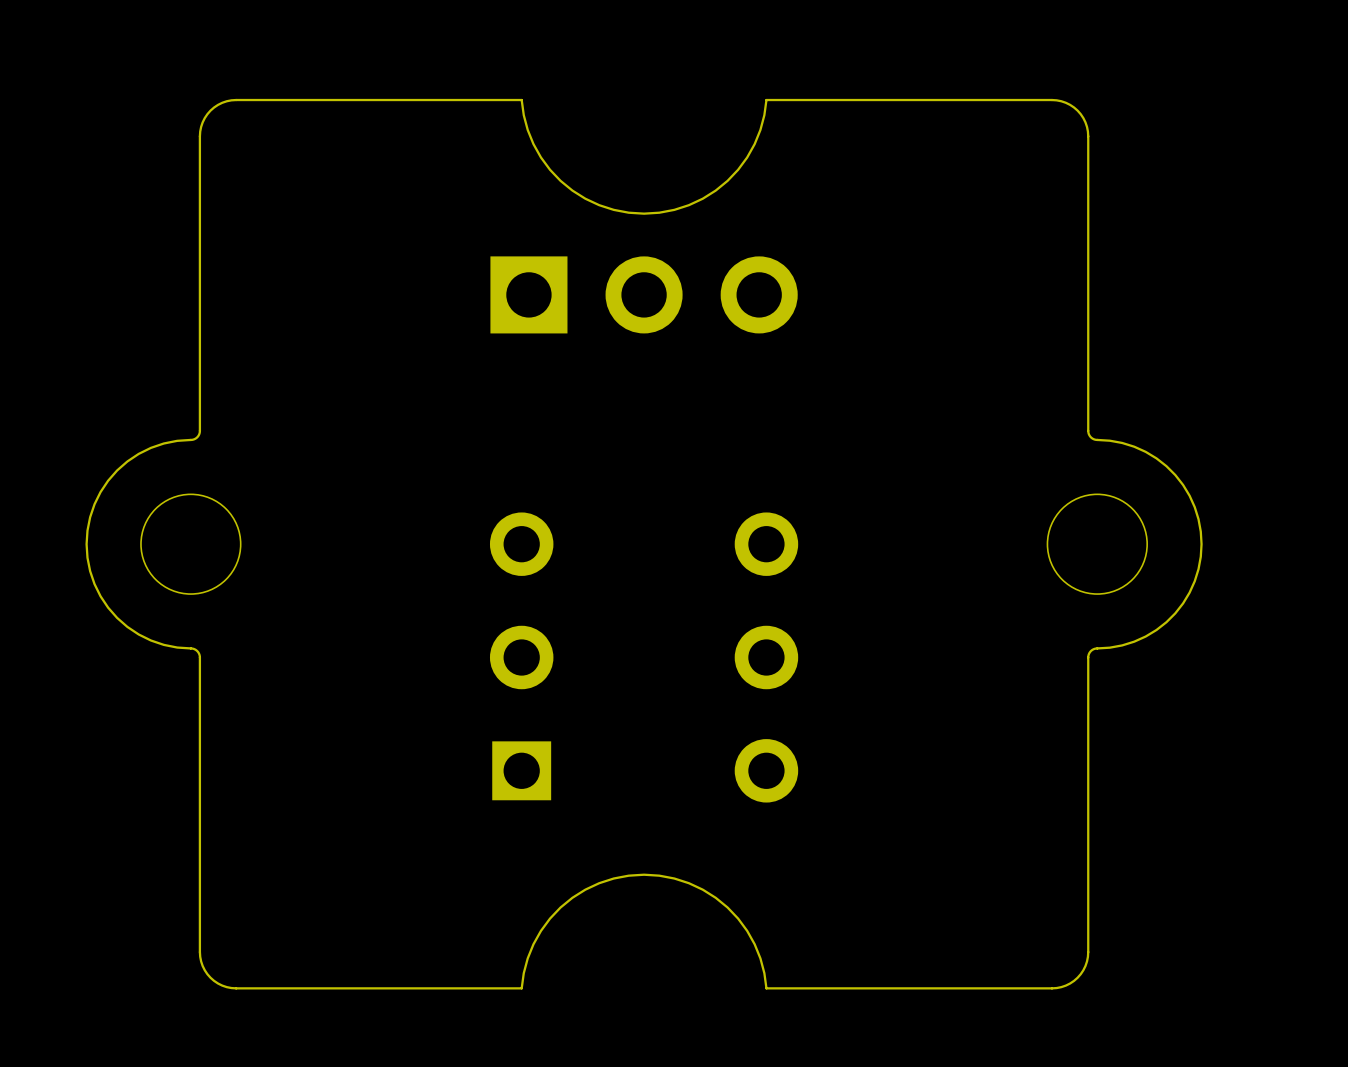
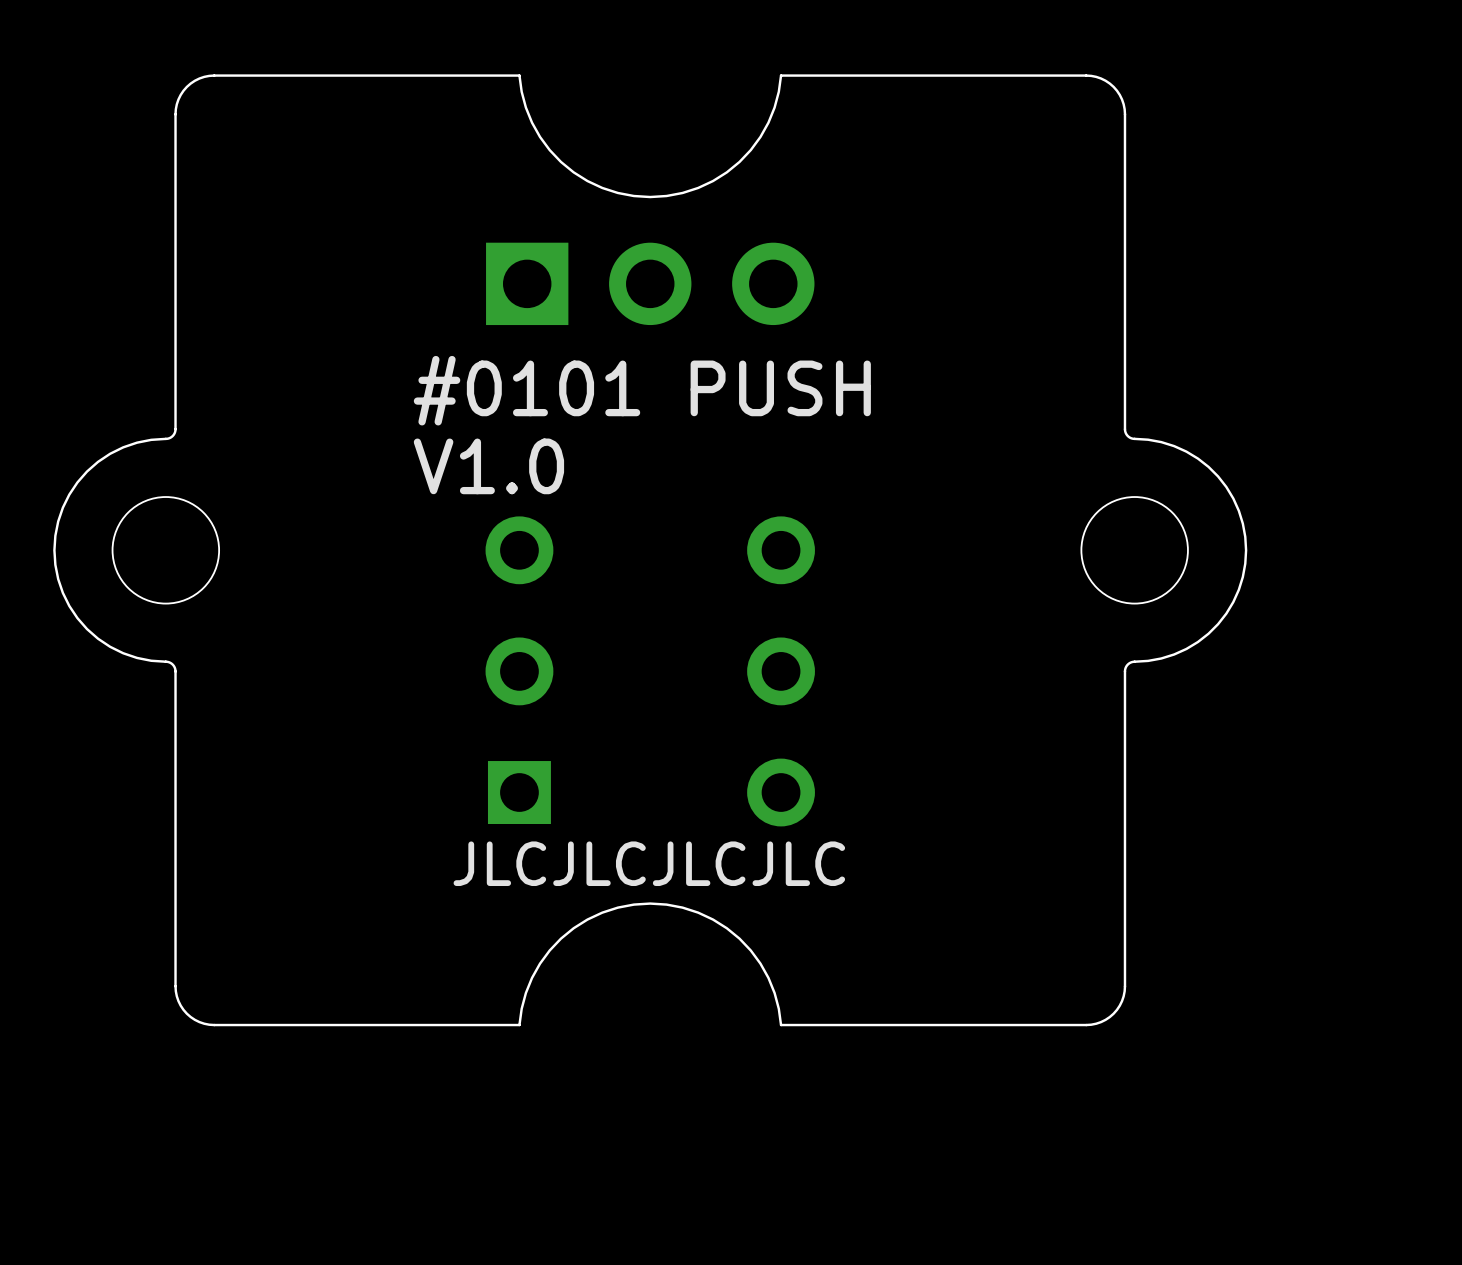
text: none -> #0101 PUSH (642, 390)
text: none -> V1.0 (488, 466)
text: none -> JLCJLCJLCJLC (649, 863)

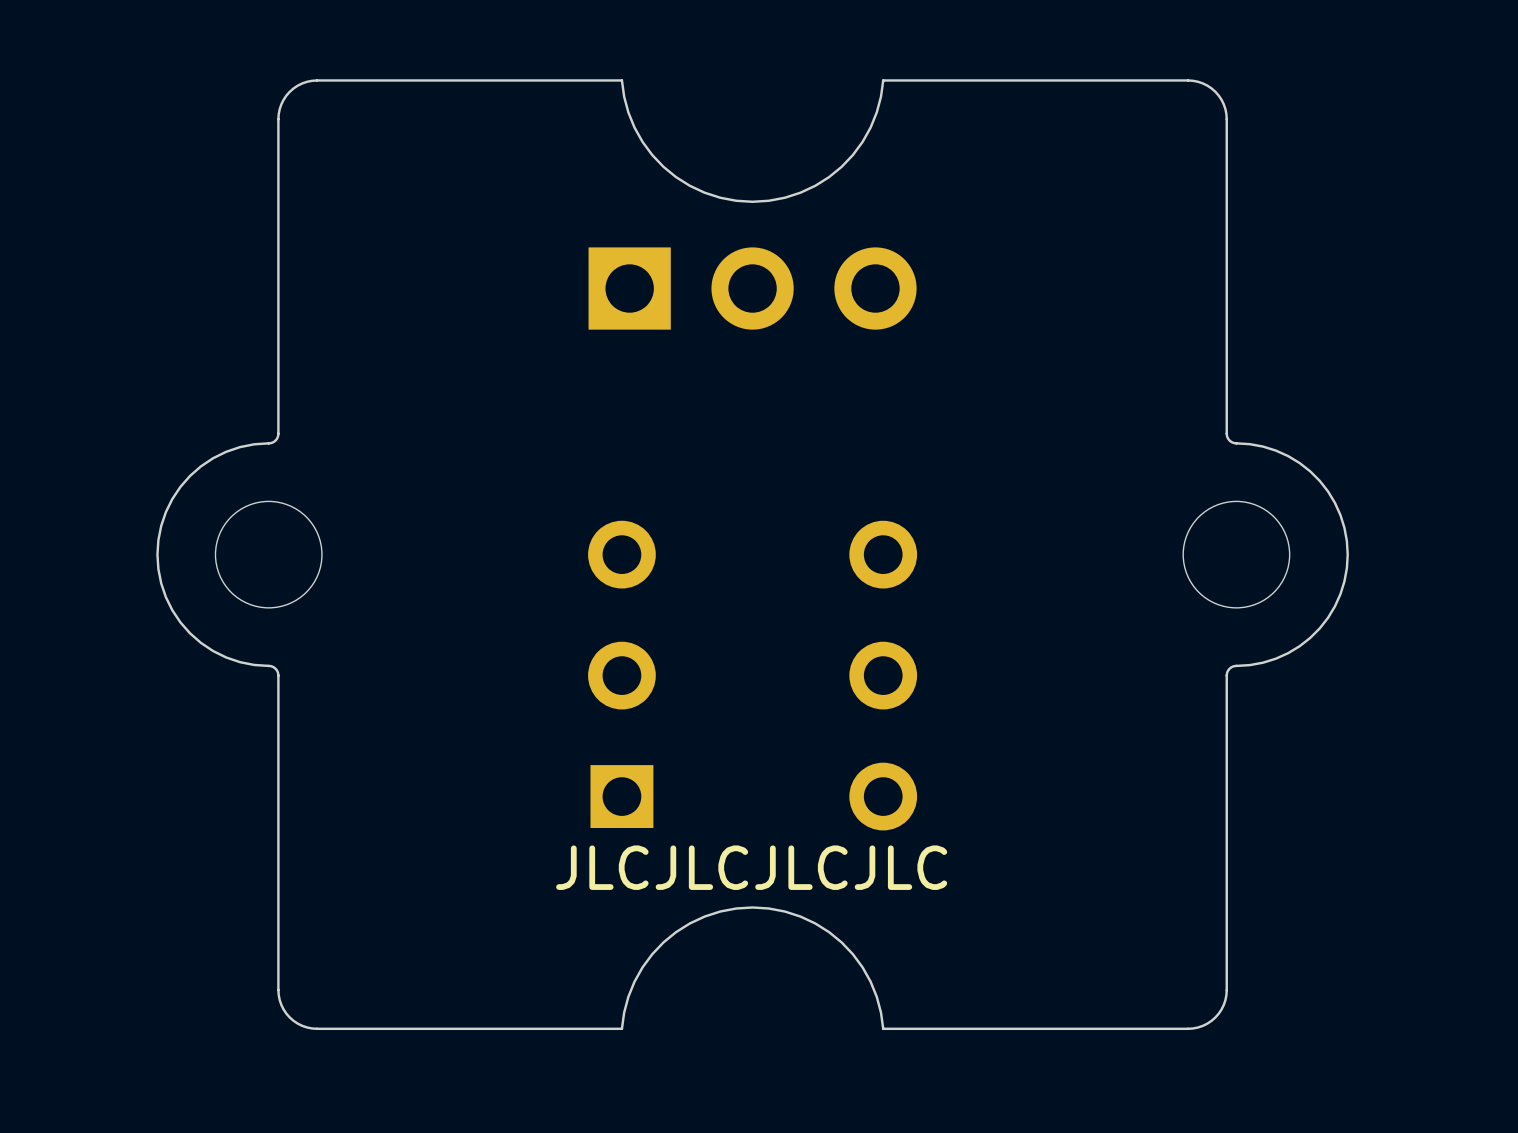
text: #0101 PUSH (642, 390) -> none
text: V1.0 (488, 466) -> none

